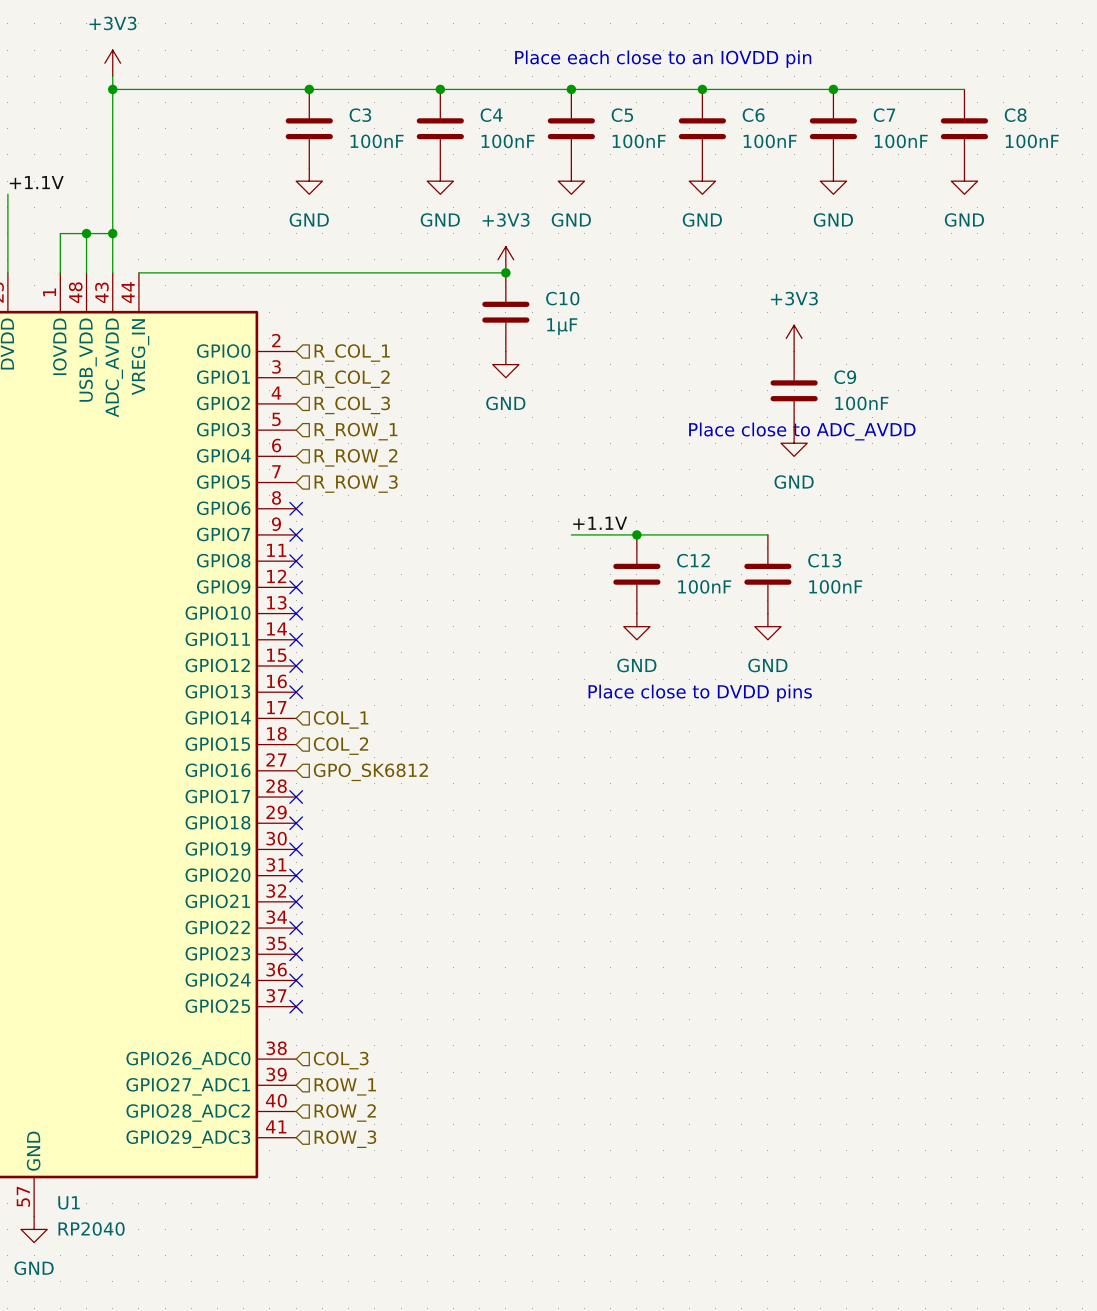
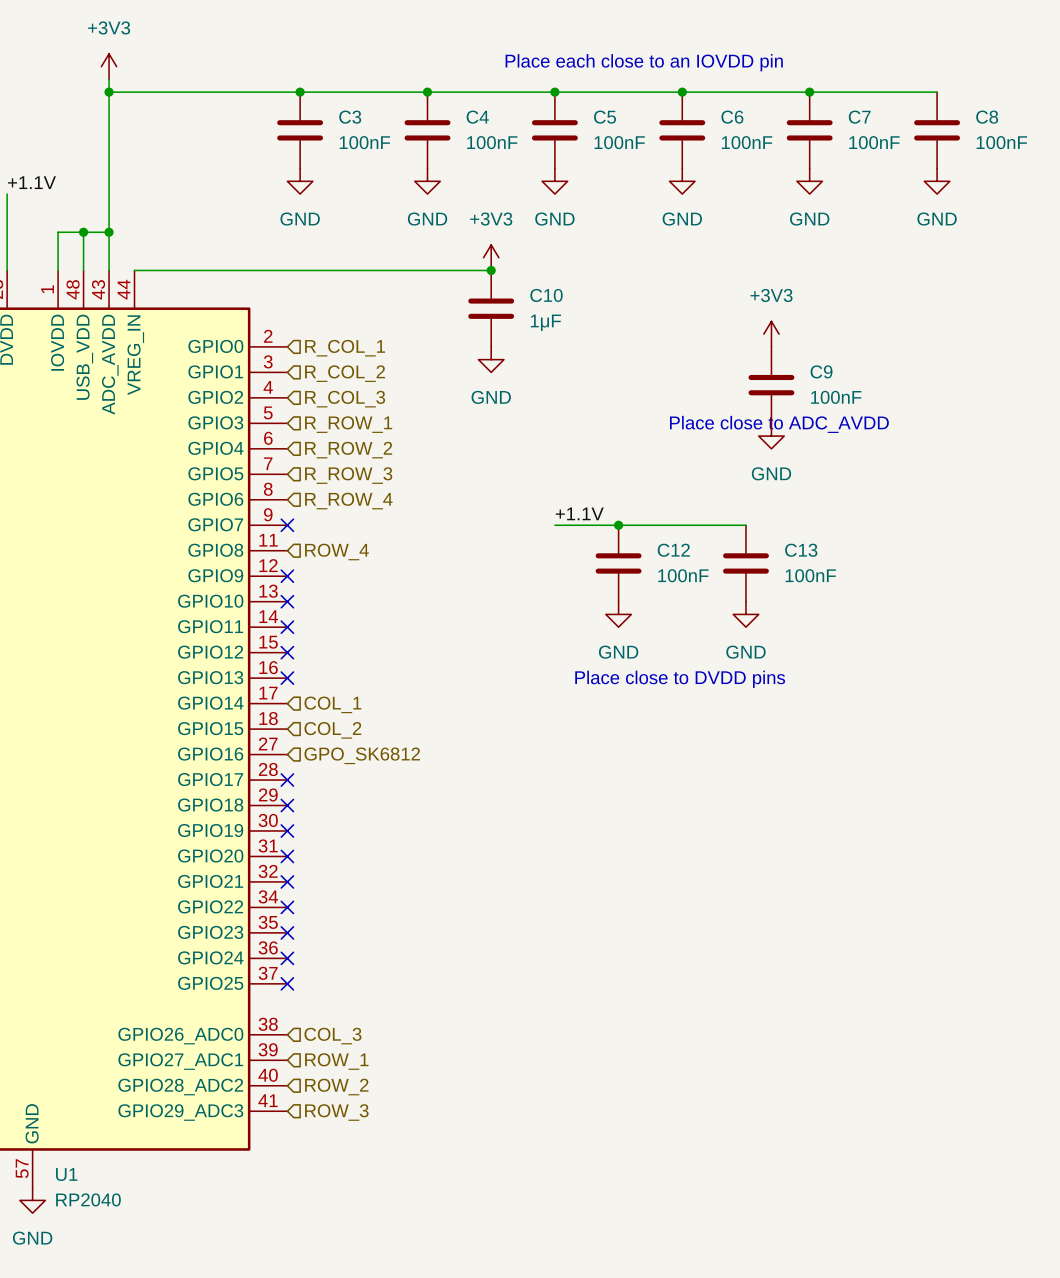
no-connect mark: (296, 508) -> none
hierarchical label: none -> R_ROW_4 (348, 501)
no-connect mark: (296, 561) -> none
hierarchical label: none -> ROW_4 (336, 552)

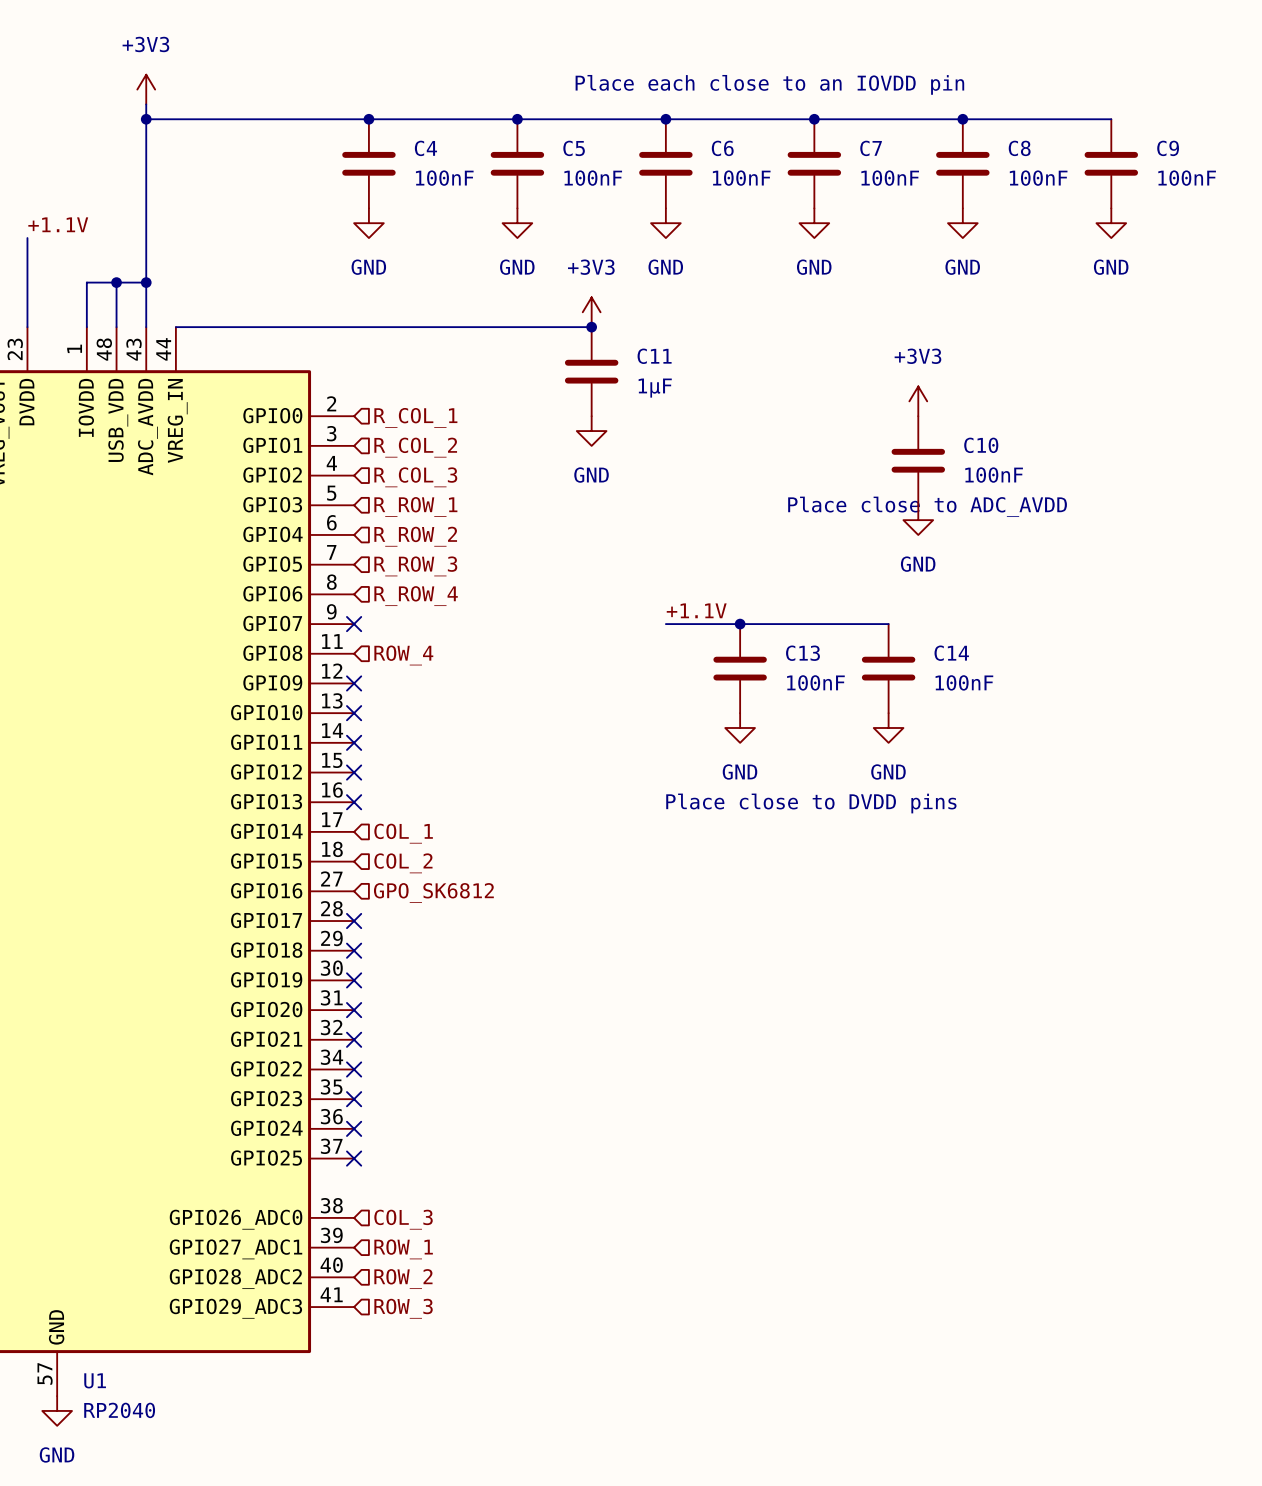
C3 name: C3 (350, 117) -> C4 (425, 148)
C4 name: C4 (477, 117) -> C5 (574, 148)
C5 name: C5 (605, 117) -> C6 (722, 148)
C6 name: C6 (732, 117) -> C7 (871, 148)
C7 name: C7 (859, 117) -> C8 (1019, 148)
C8 name: C8 (987, 117) -> C9 (1168, 148)
C10 name: C10 (546, 295) -> C11 (654, 356)
C9 name: C9 (821, 371) -> C10 (981, 445)
C12 name: C12 (673, 550) -> C13 (802, 653)
C13 name: C13 (801, 550) -> C14 (951, 653)

